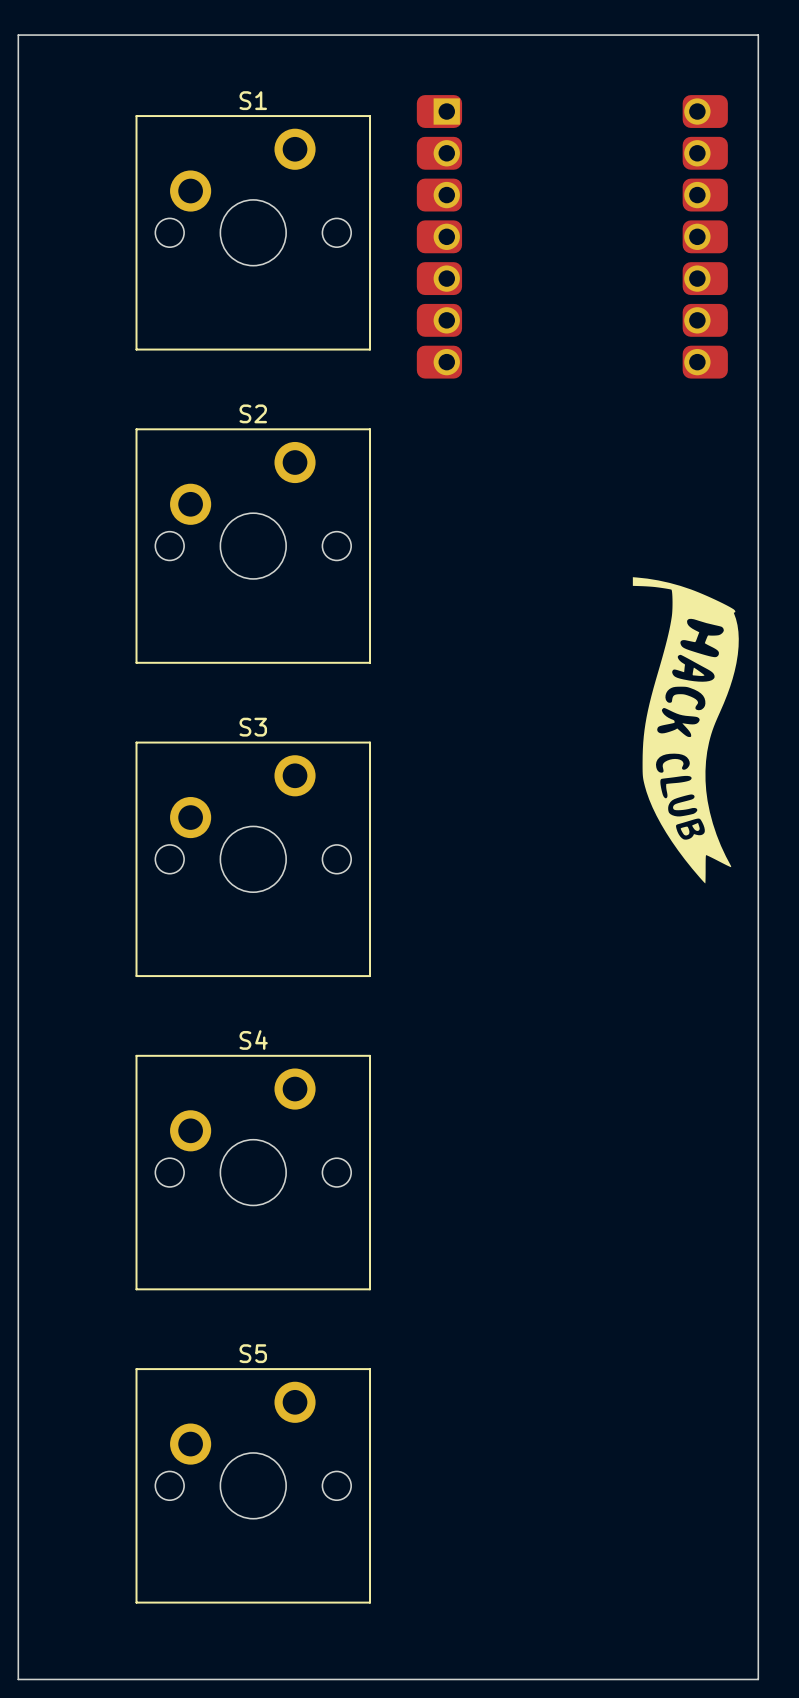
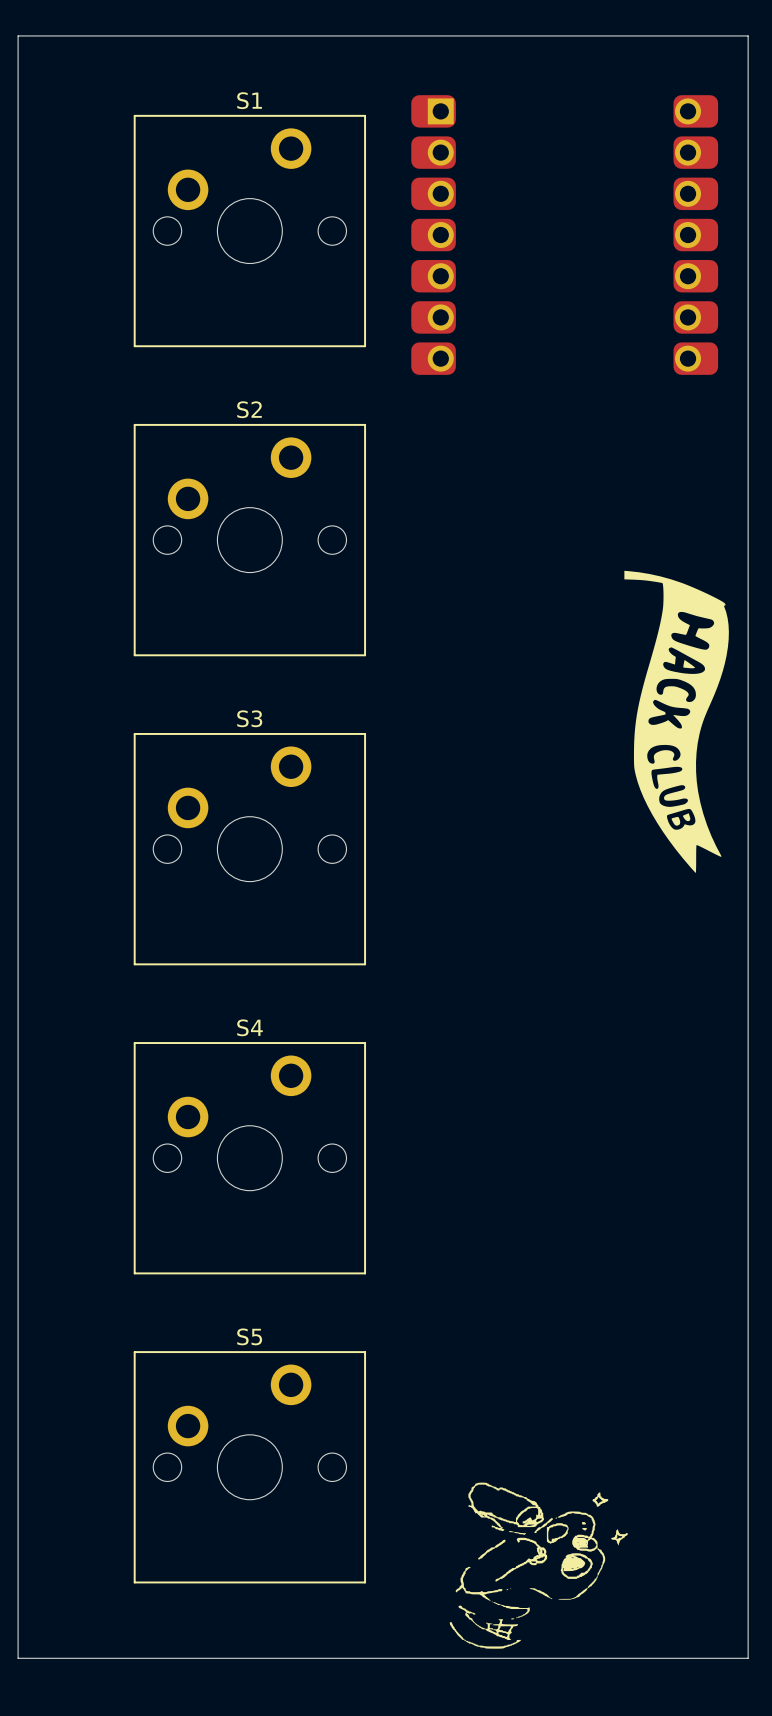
drawing: none -> [449, 1482, 628, 1649]

